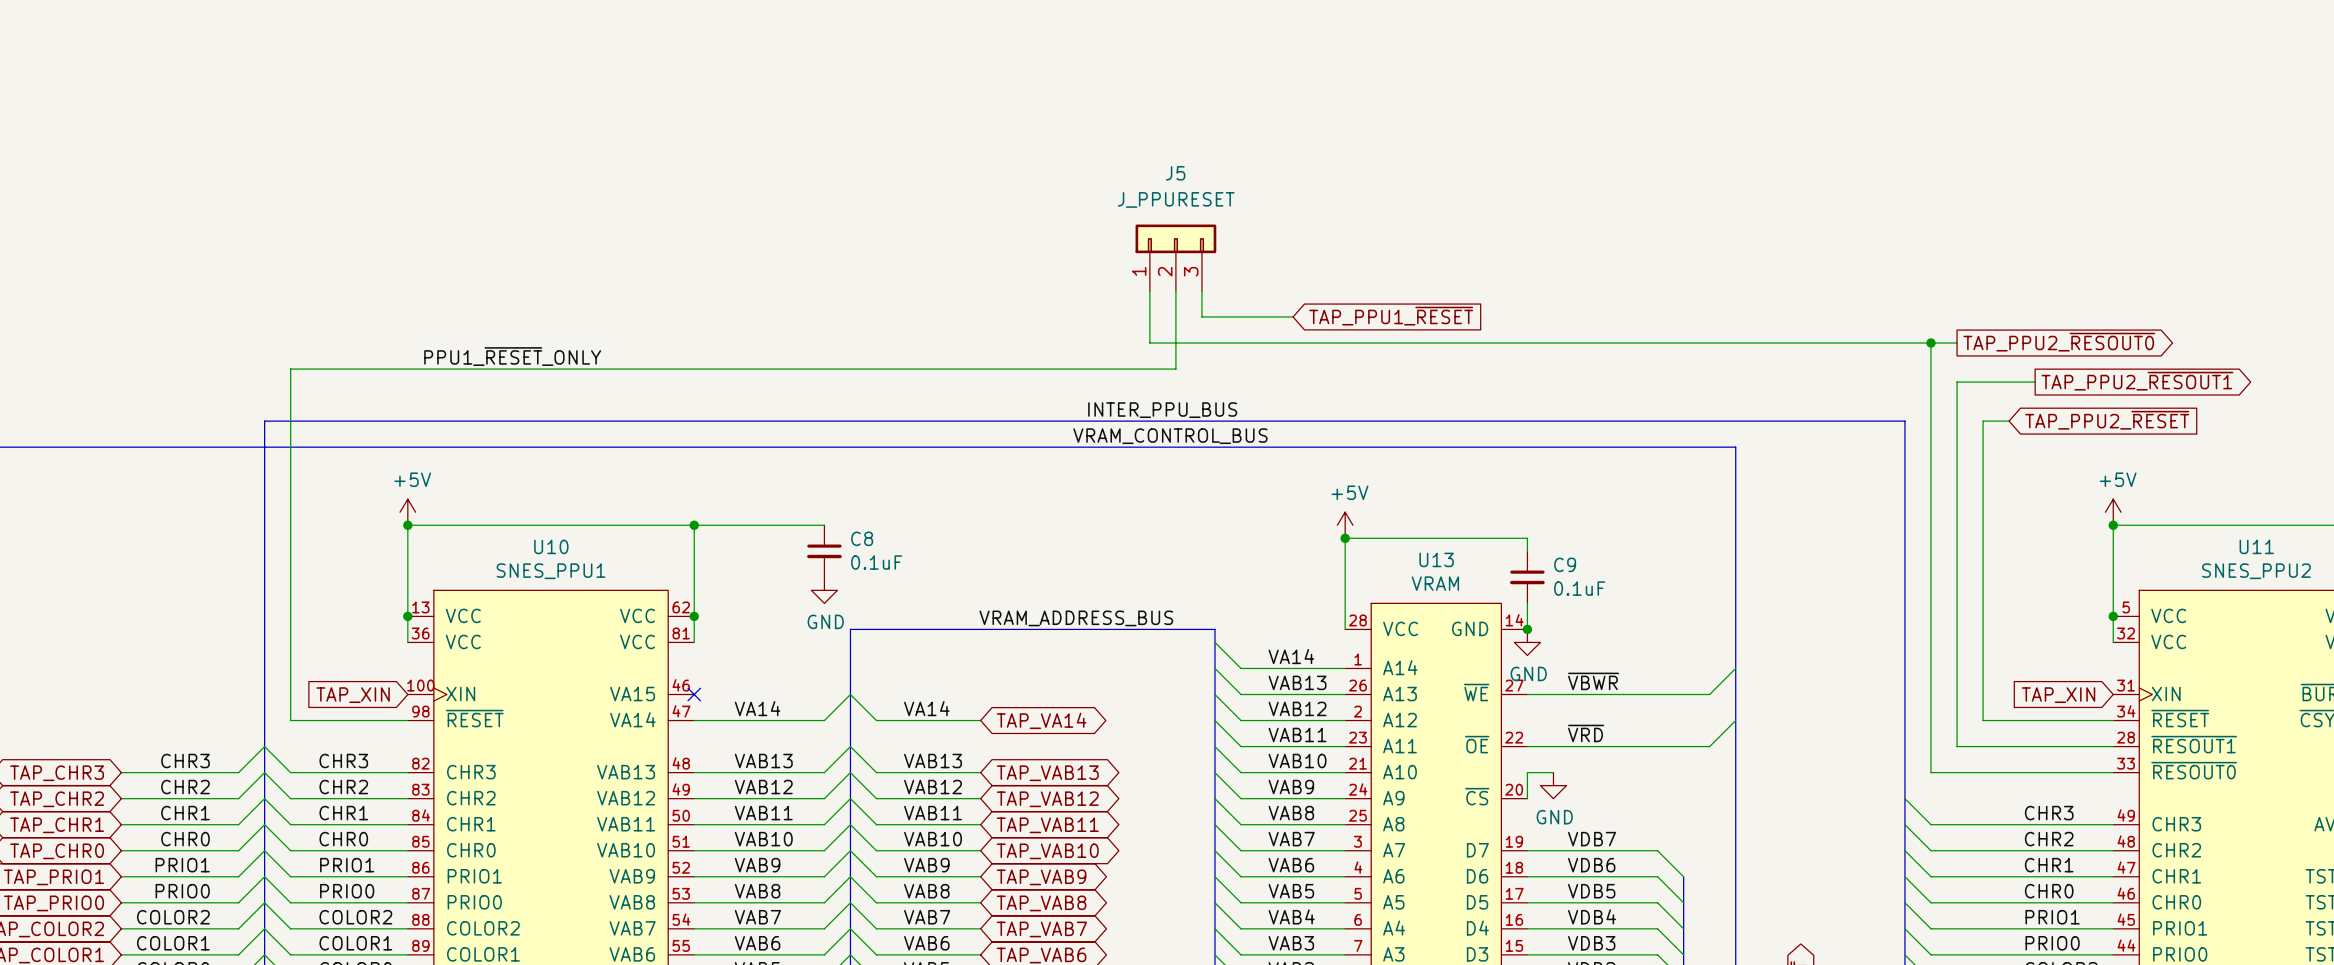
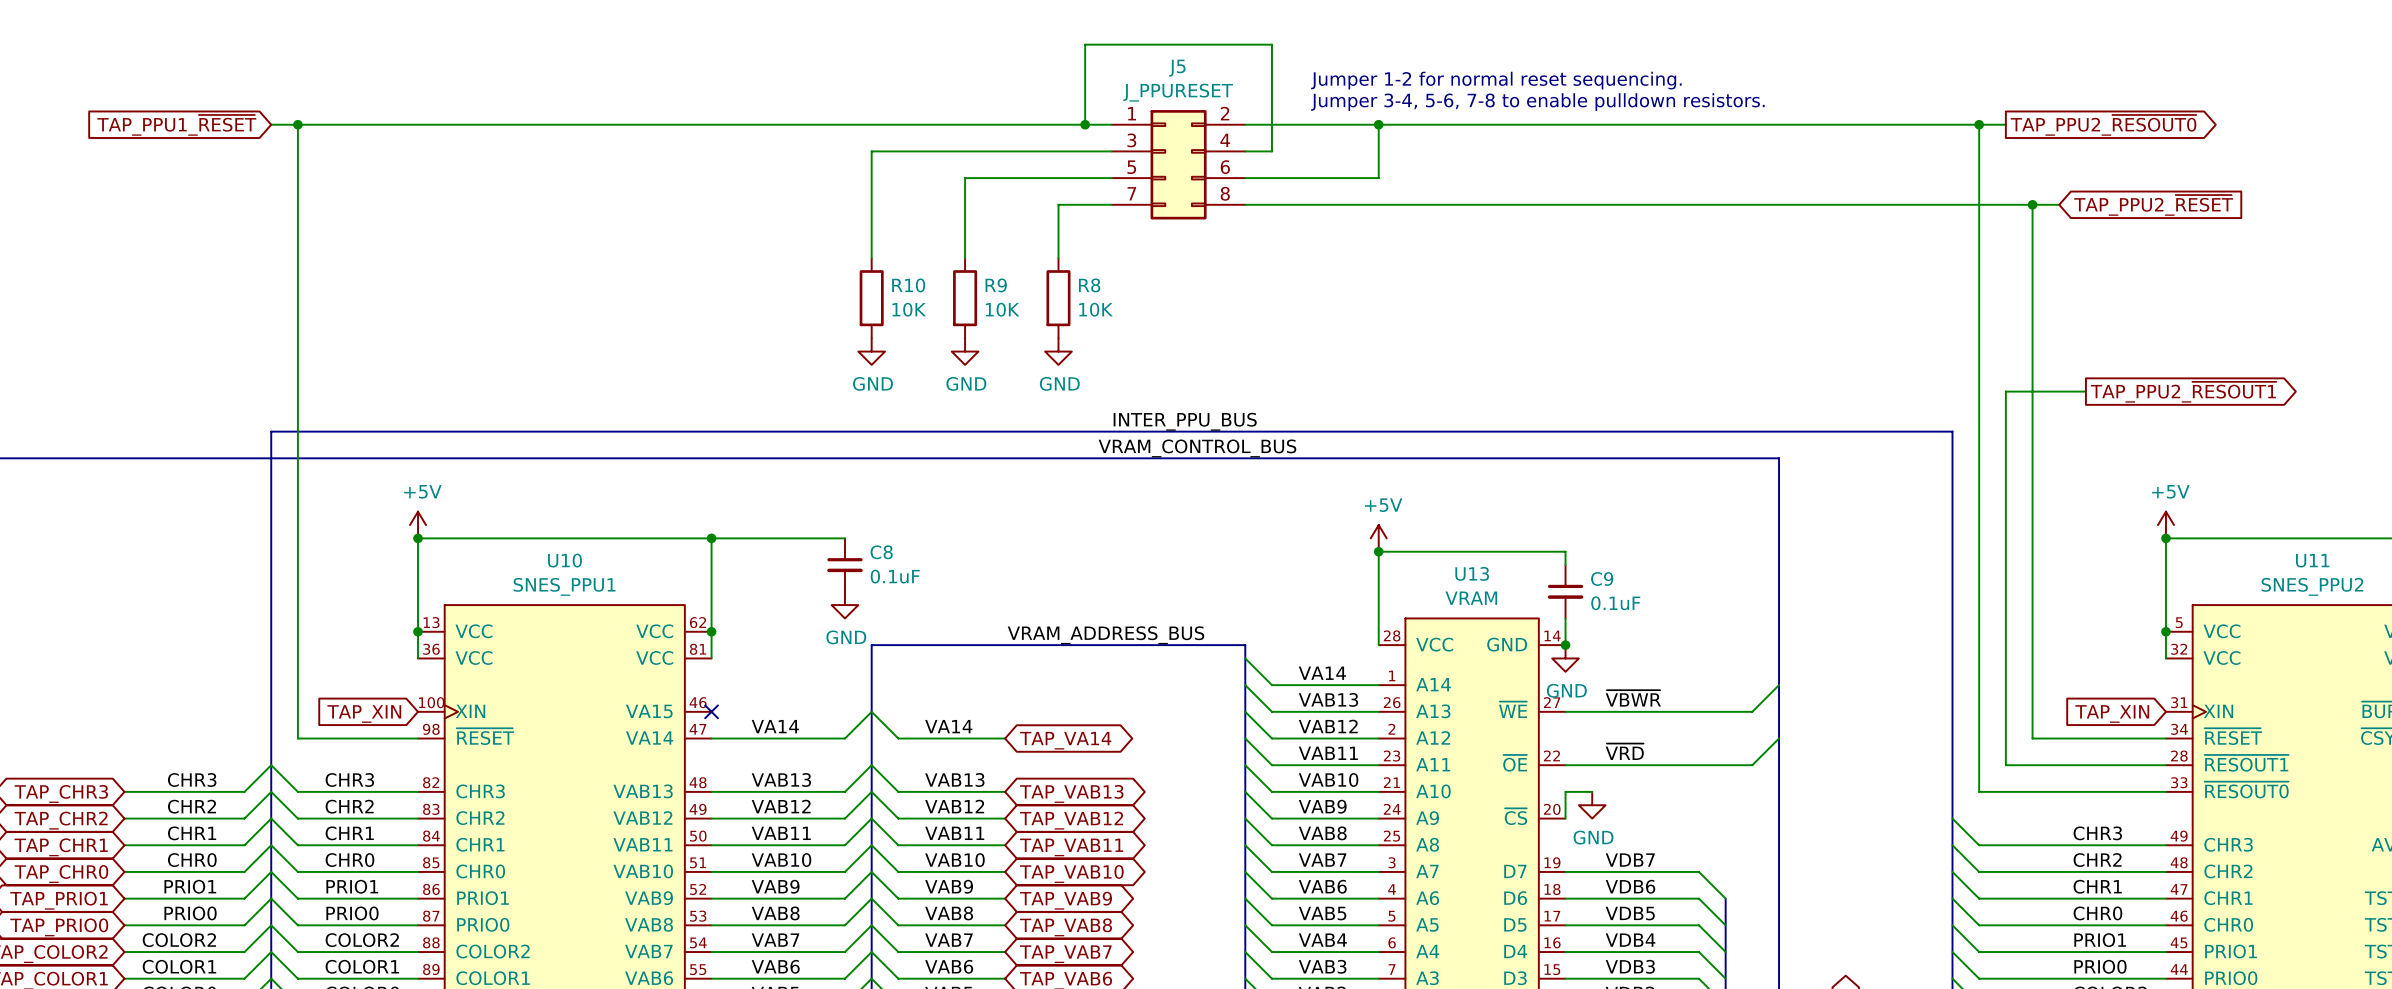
text: none -> Jumper 1-2 for normal reset sequencing. (1496, 80)
text: none -> Jumper 3-4, 5-6, 7-8 to enable pulldown resistors. (1537, 102)
global label: none -> TAP_PPU1_~{RESET} (176, 125)
wire: none -> (271, 124) (1111, 124)
junction: none -> (297, 124)
wire: none -> (1085, 124) (1085, 44) (1271, 44) (1271, 151) (1245, 151)
junction: none -> (1085, 124)
wire: none -> (1245, 124) (2005, 124)
wire: none -> (1378, 124) (1378, 178) (1245, 178)
junction: none -> (1378, 124)
wire: none -> (1979, 124) (1979, 351)
junction: none -> (1979, 124)
wire: none -> (1111, 151) (871, 151) (871, 258)
wire: none -> (1111, 178) (965, 178) (965, 258)
wire: none -> (1111, 204) (1058, 204) (1058, 258)
wire: none -> (1245, 204) (2059, 204)
junction: none -> (2032, 204)
J5 symbol: [1135, 224, 1217, 291] -> [1111, 110, 1246, 220]
R10: none -> 10K (871, 298)
R9: none -> 10K (965, 298)
R8: none -> 10K (1058, 298)
wire: (1149, 290) (1149, 343) (1957, 343) -> none
wire: (1175, 290) (1175, 369) (290, 369) -> (297, 124) (297, 378)
wire: (1201, 290) (1201, 316) (1293, 316) -> none
global label: TAP_PPU1_~{RESET} (1391, 316) -> none
global label position: TAP_PPU2_~{RESOUT0} (2059, 342) -> TAP_PPU2_~{RESOUT0} (2103, 125)
power symbol: none -> GND (871, 351)
power symbol: none -> GND (965, 351)
power symbol: none -> GND (1058, 351)
junction: (1931, 343) -> none
label: PPU1_~{RESET}_ONLY (512, 356) -> none
global label position: TAP_PPU2_~{RESET} (2107, 420) -> TAP_PPU2_~{RESET} (2153, 205)
wire: (1983, 421) (2009, 421) -> (2032, 431) (2032, 204)

